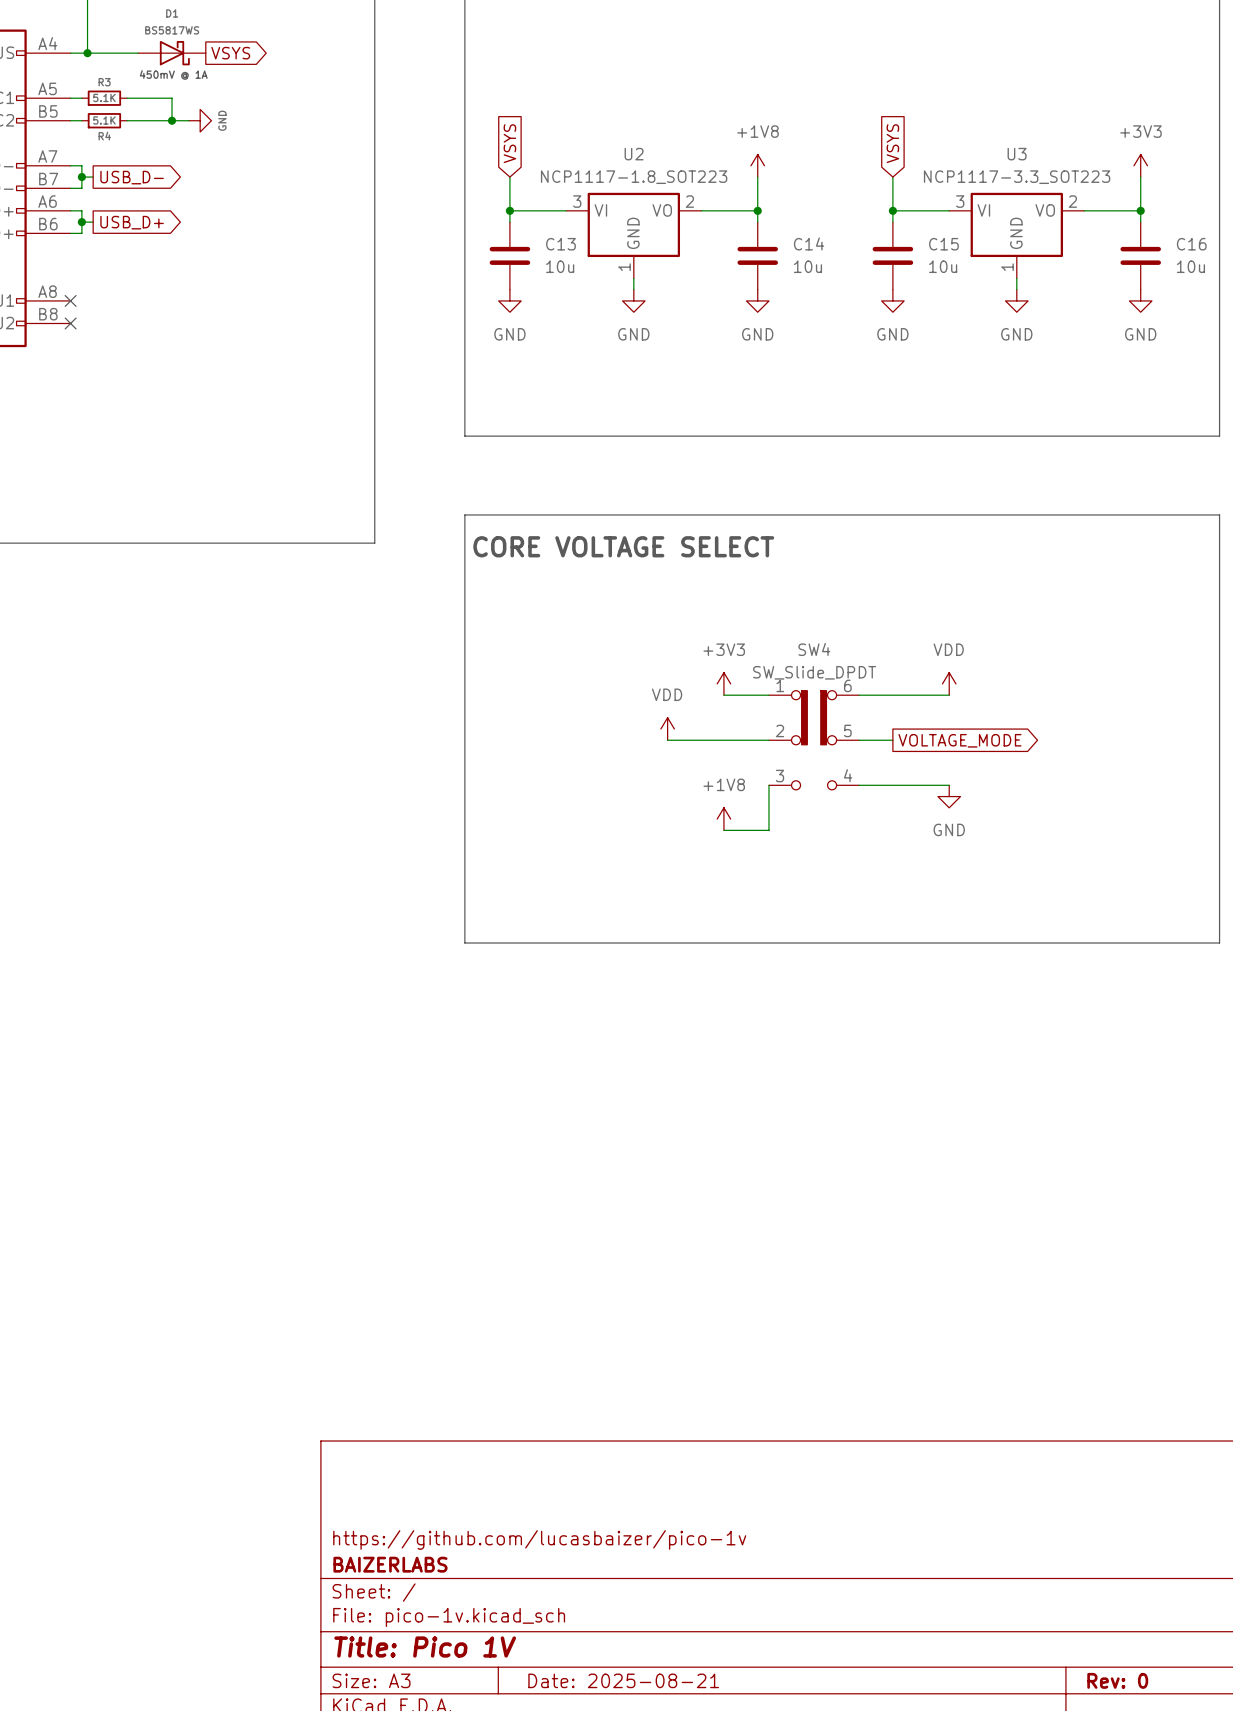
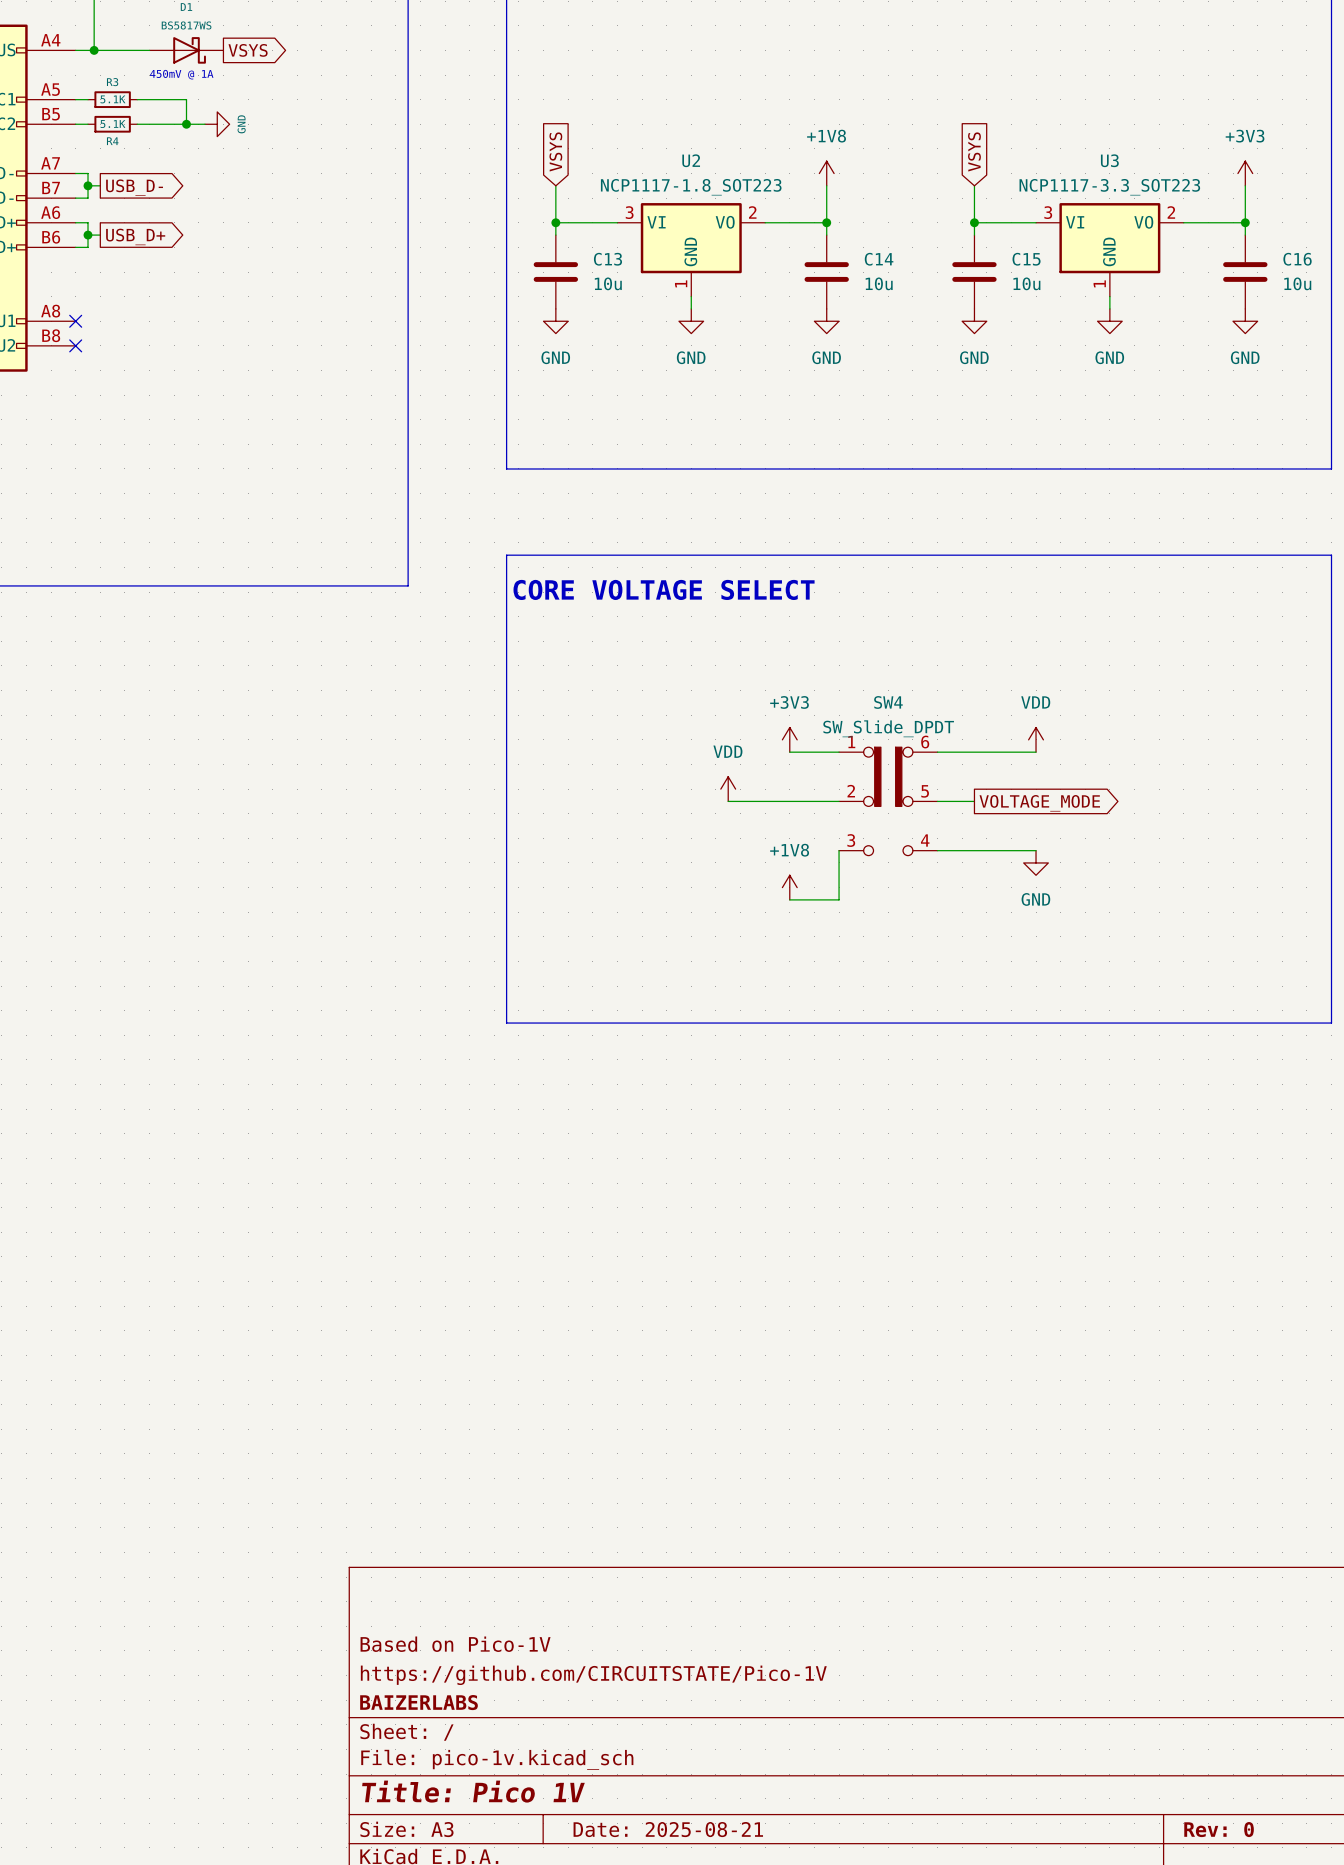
title block: none -> Based on Pico-1V (455, 1644)
title block: https://github.com/lucasbaizer/pico-1v (539, 1539) -> https://github.com/CIRCUITSTATE/Pico-1V (593, 1675)

